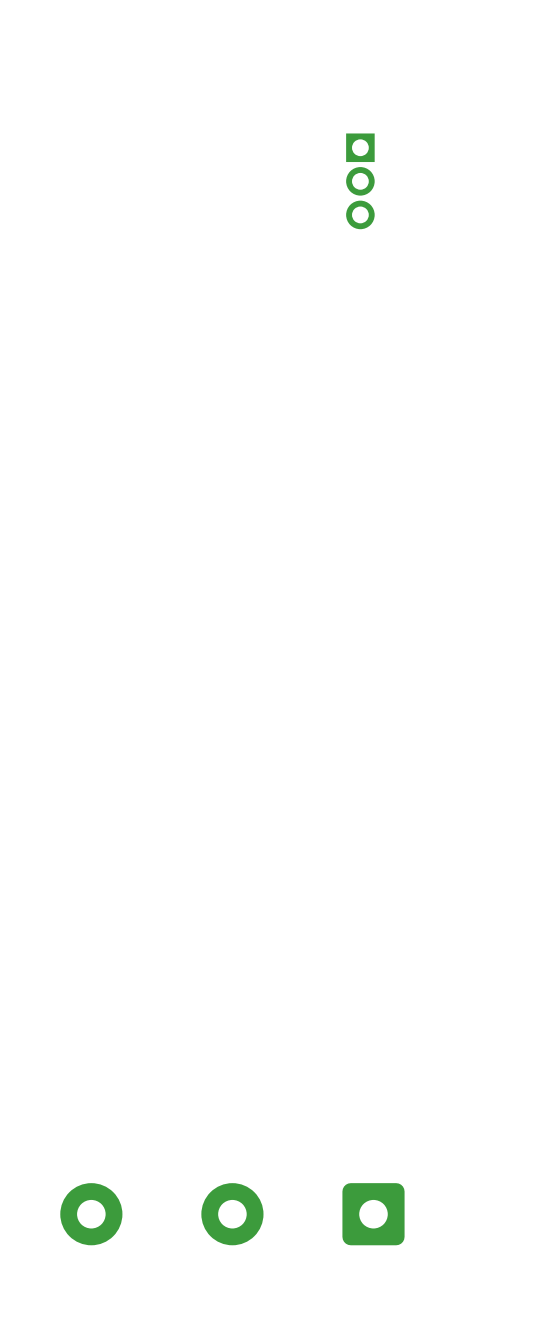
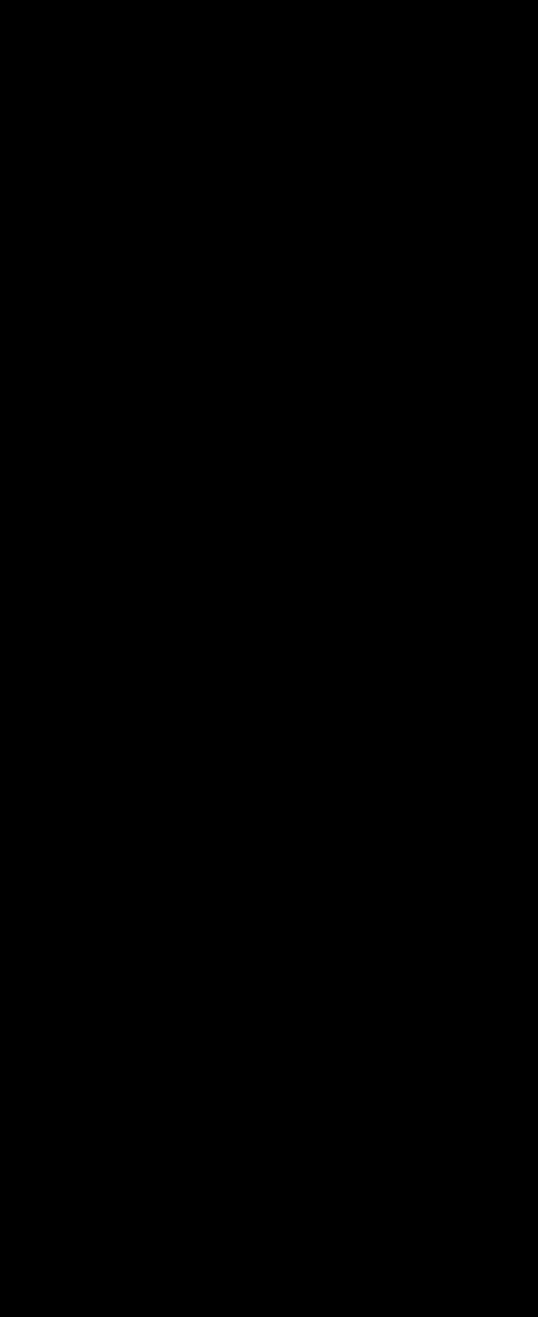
part: (360, 181) -> none
part: (232, 1214) -> none

